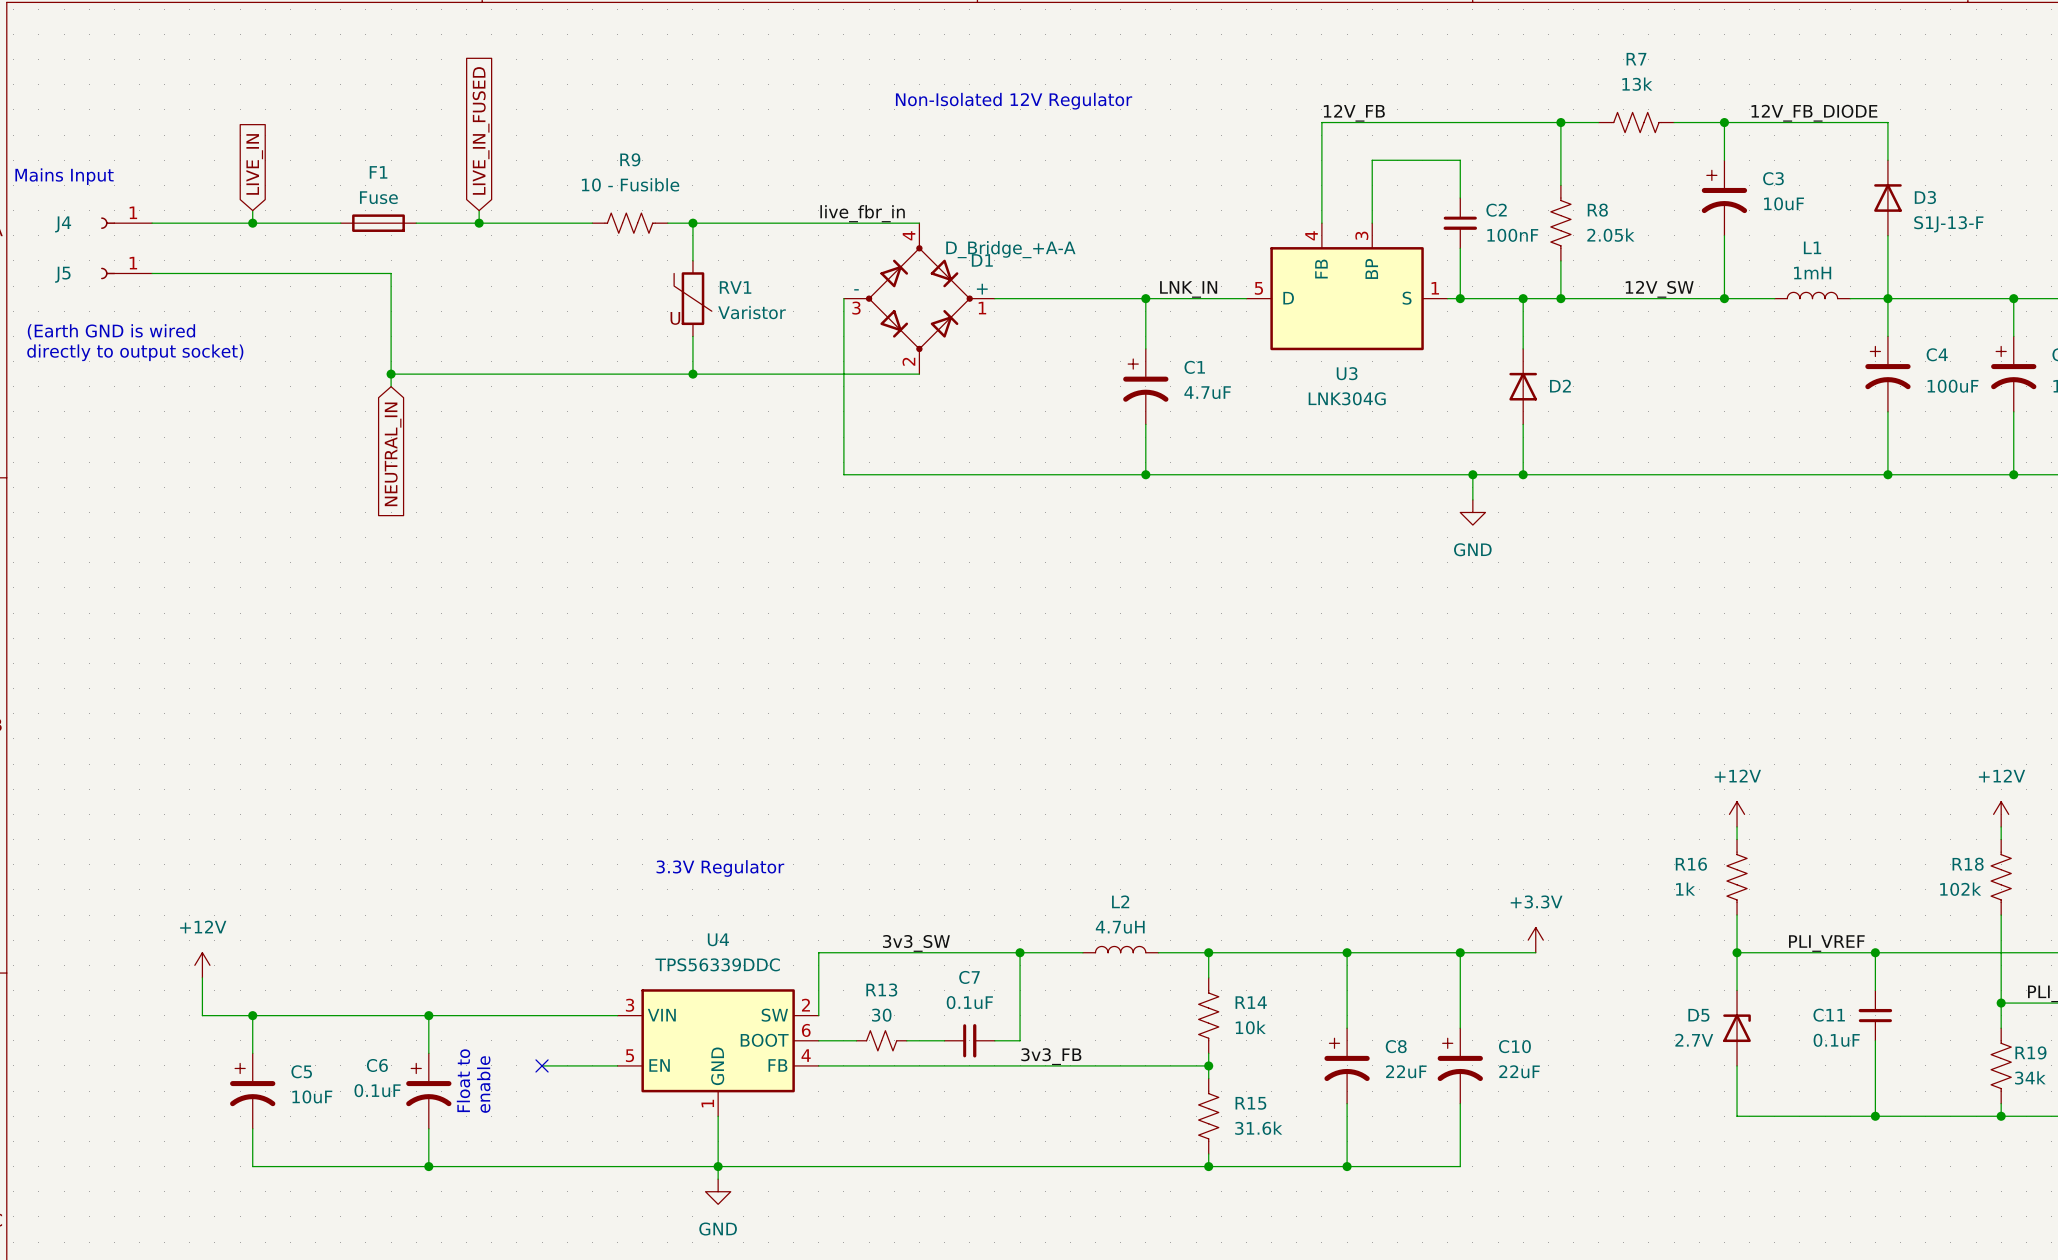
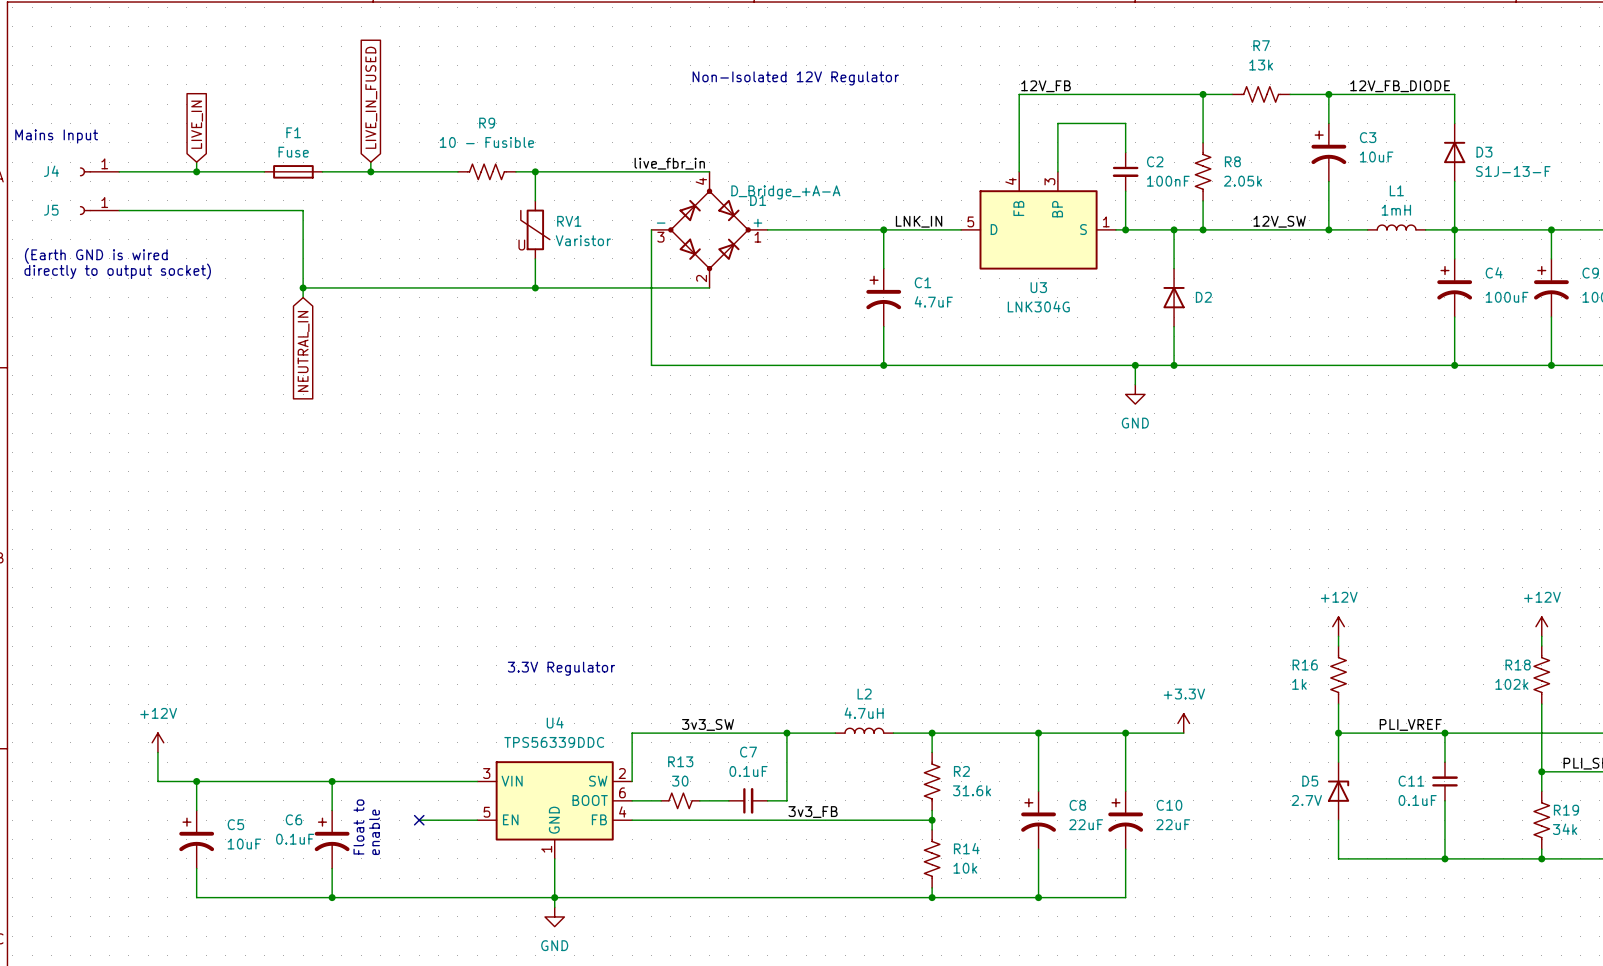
R14 name: R14 (1251, 1002) -> R2 (961, 771)
R14 value: 10k (1250, 1027) -> 31.6k (972, 790)
R15 name: R15 (1250, 1103) -> R14 (966, 848)
R15 value: 31.6k (1258, 1128) -> 10k (965, 868)

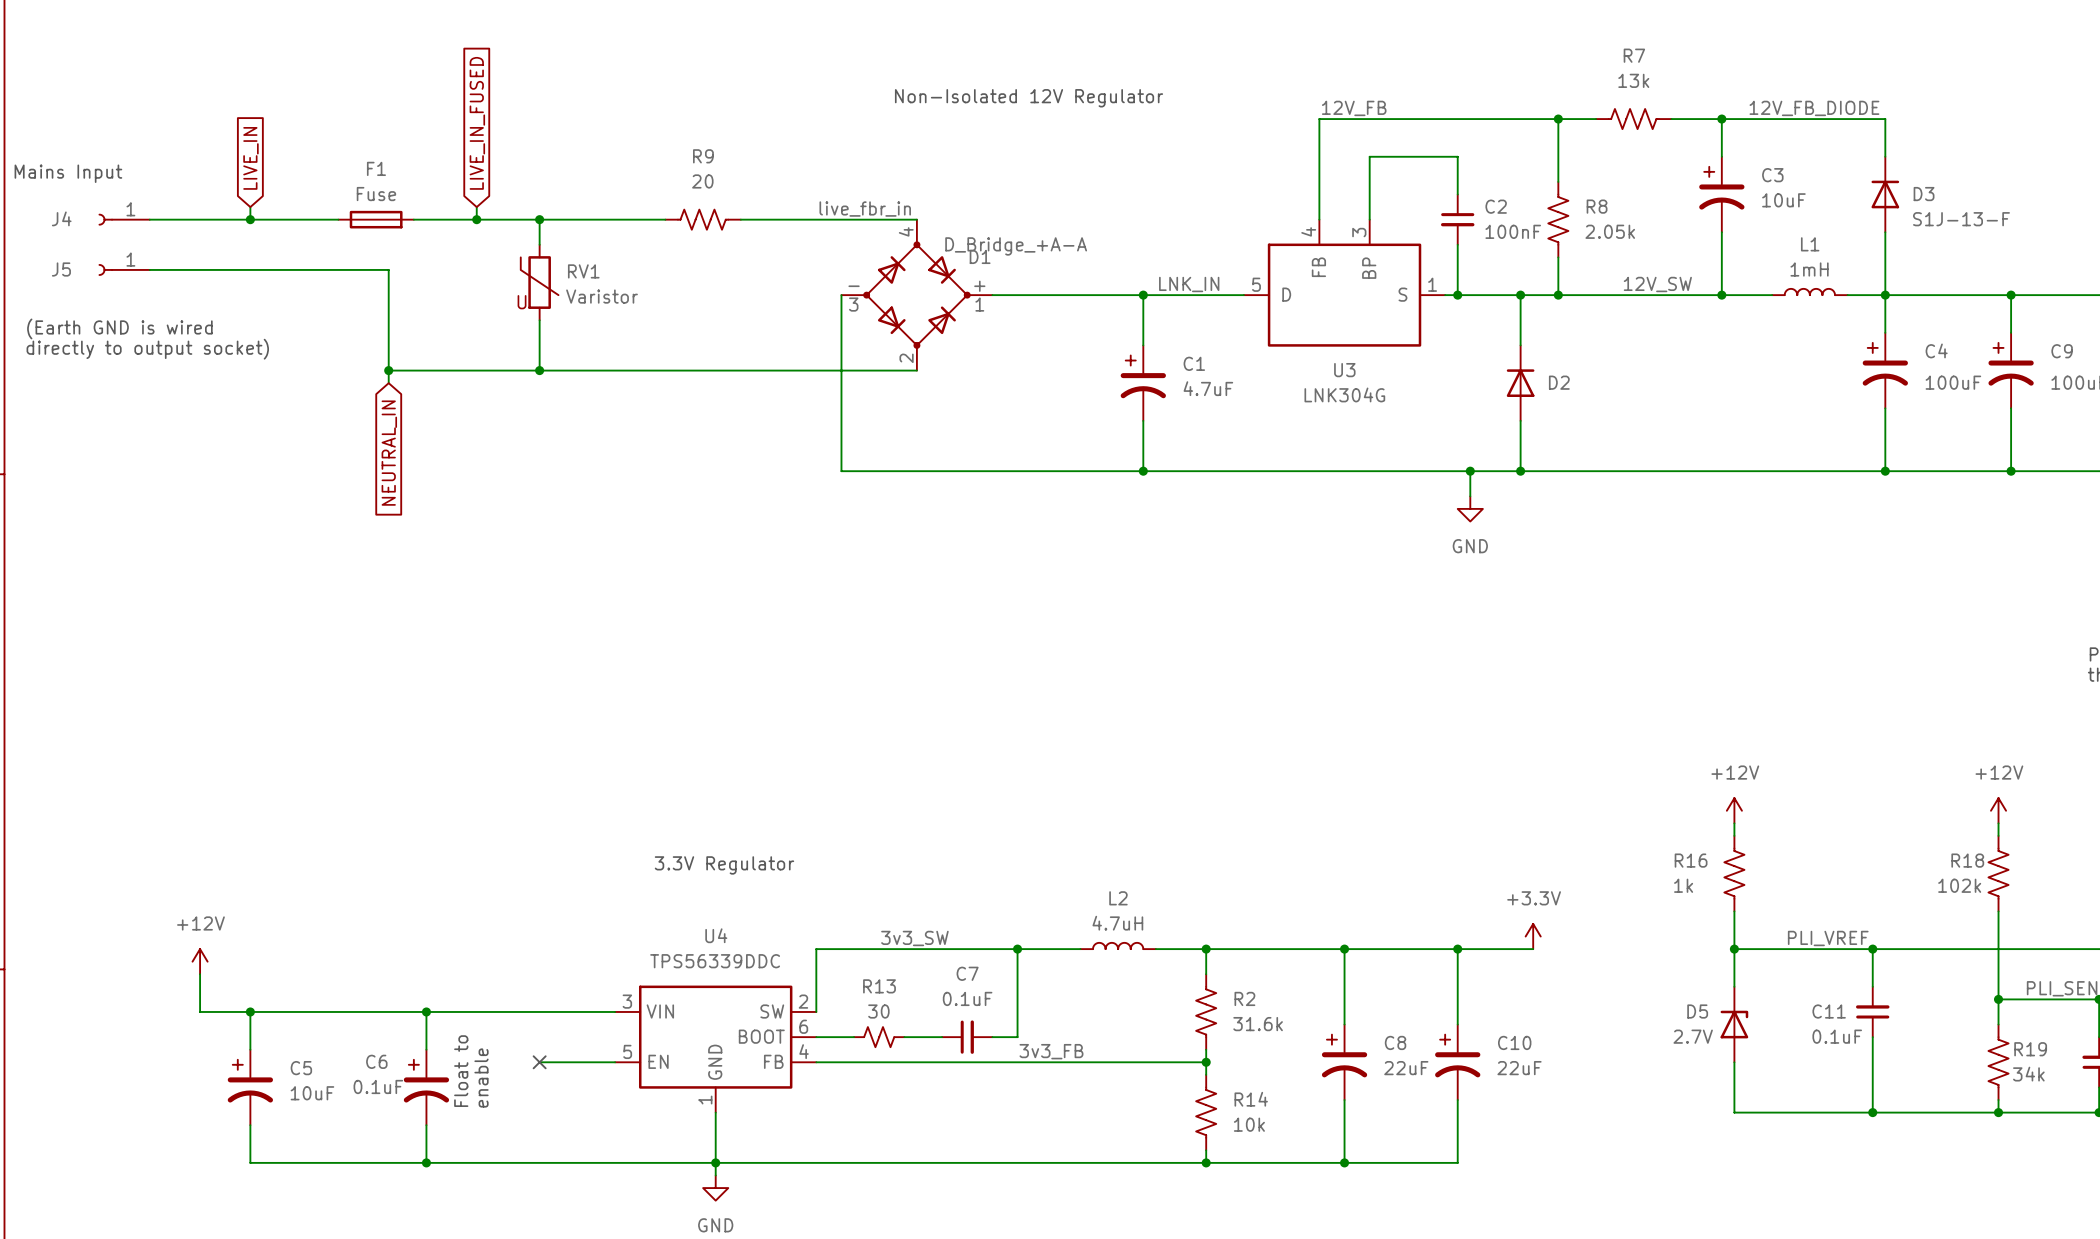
R9 value: 10 - Fusible (486, 142) -> 20 (702, 181)
wire: none -> (539, 219) (539, 244)
junction: none -> (539, 219)
R9 position: (486, 171) -> (703, 219)
wire: (535, 171) (535, 200) -> none
junction: (535, 171) -> none
RV1 position: (535, 229) -> (539, 282)
wire: none -> (539, 320) (539, 370)
wire: (535, 258) (535, 287) -> none
junction: none -> (539, 370)
junction: (535, 287) -> none

